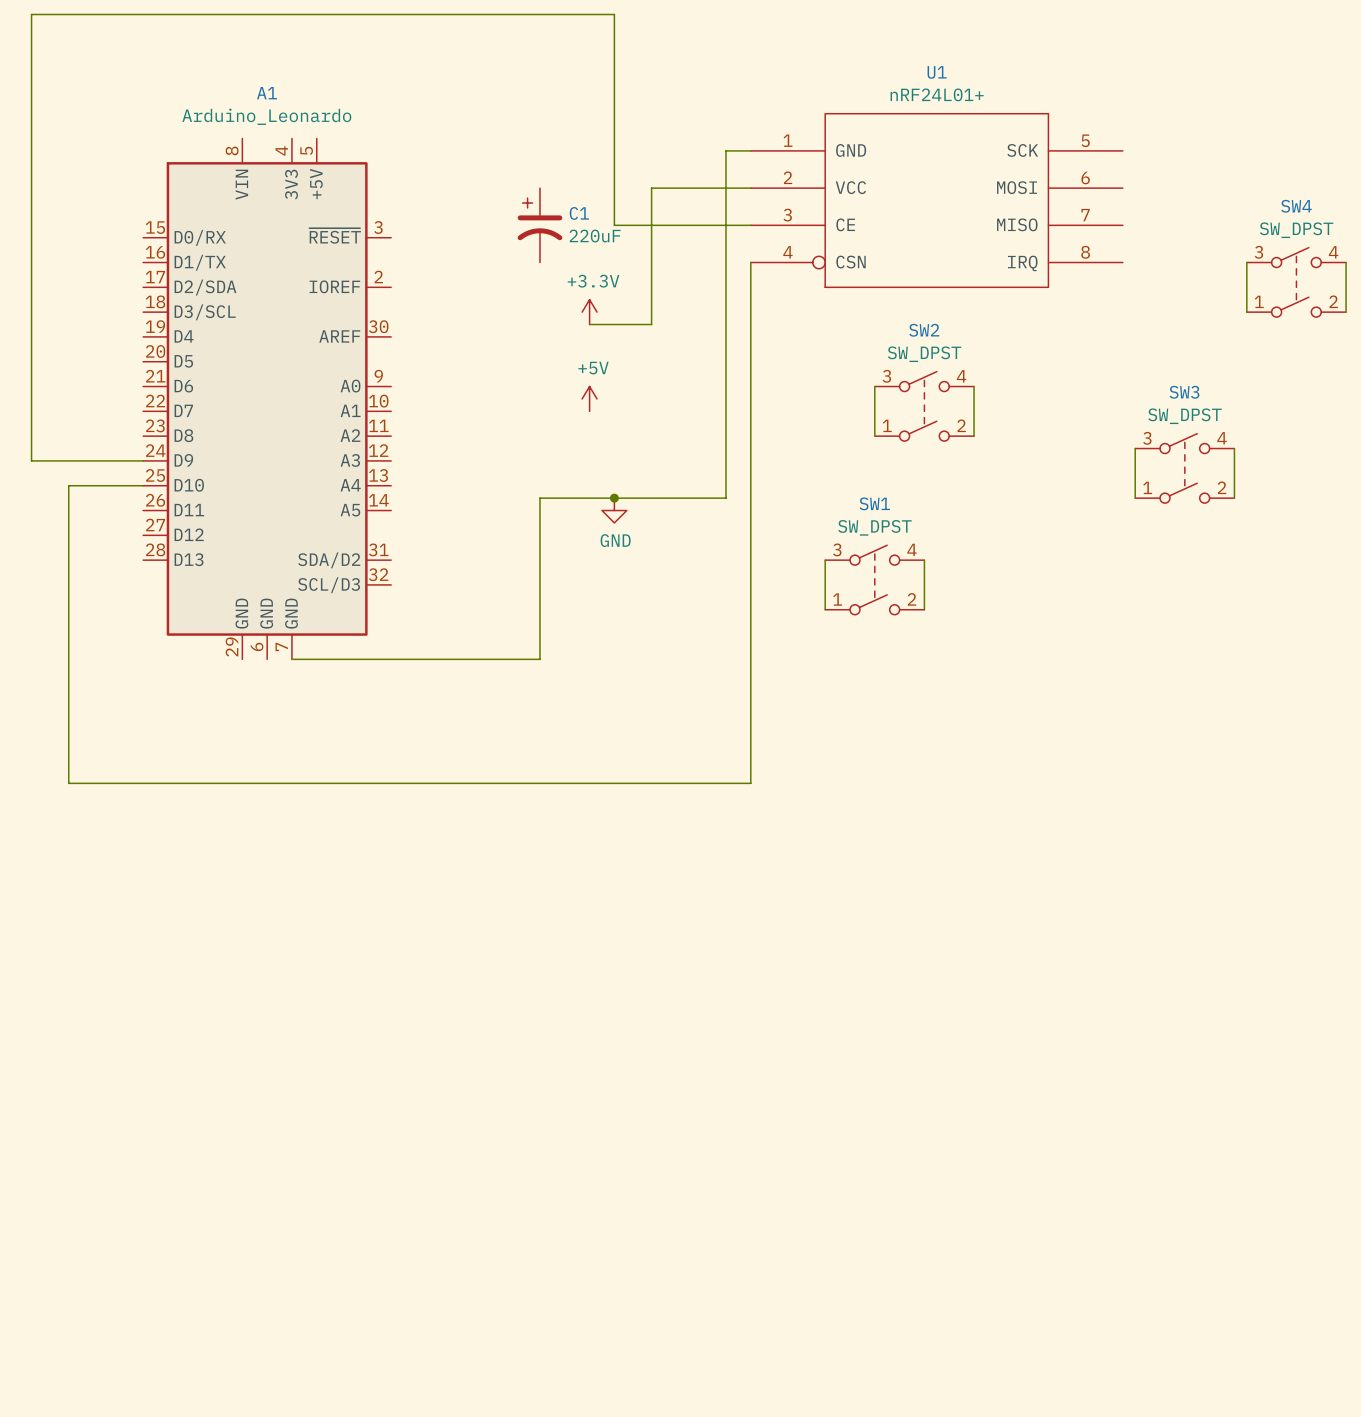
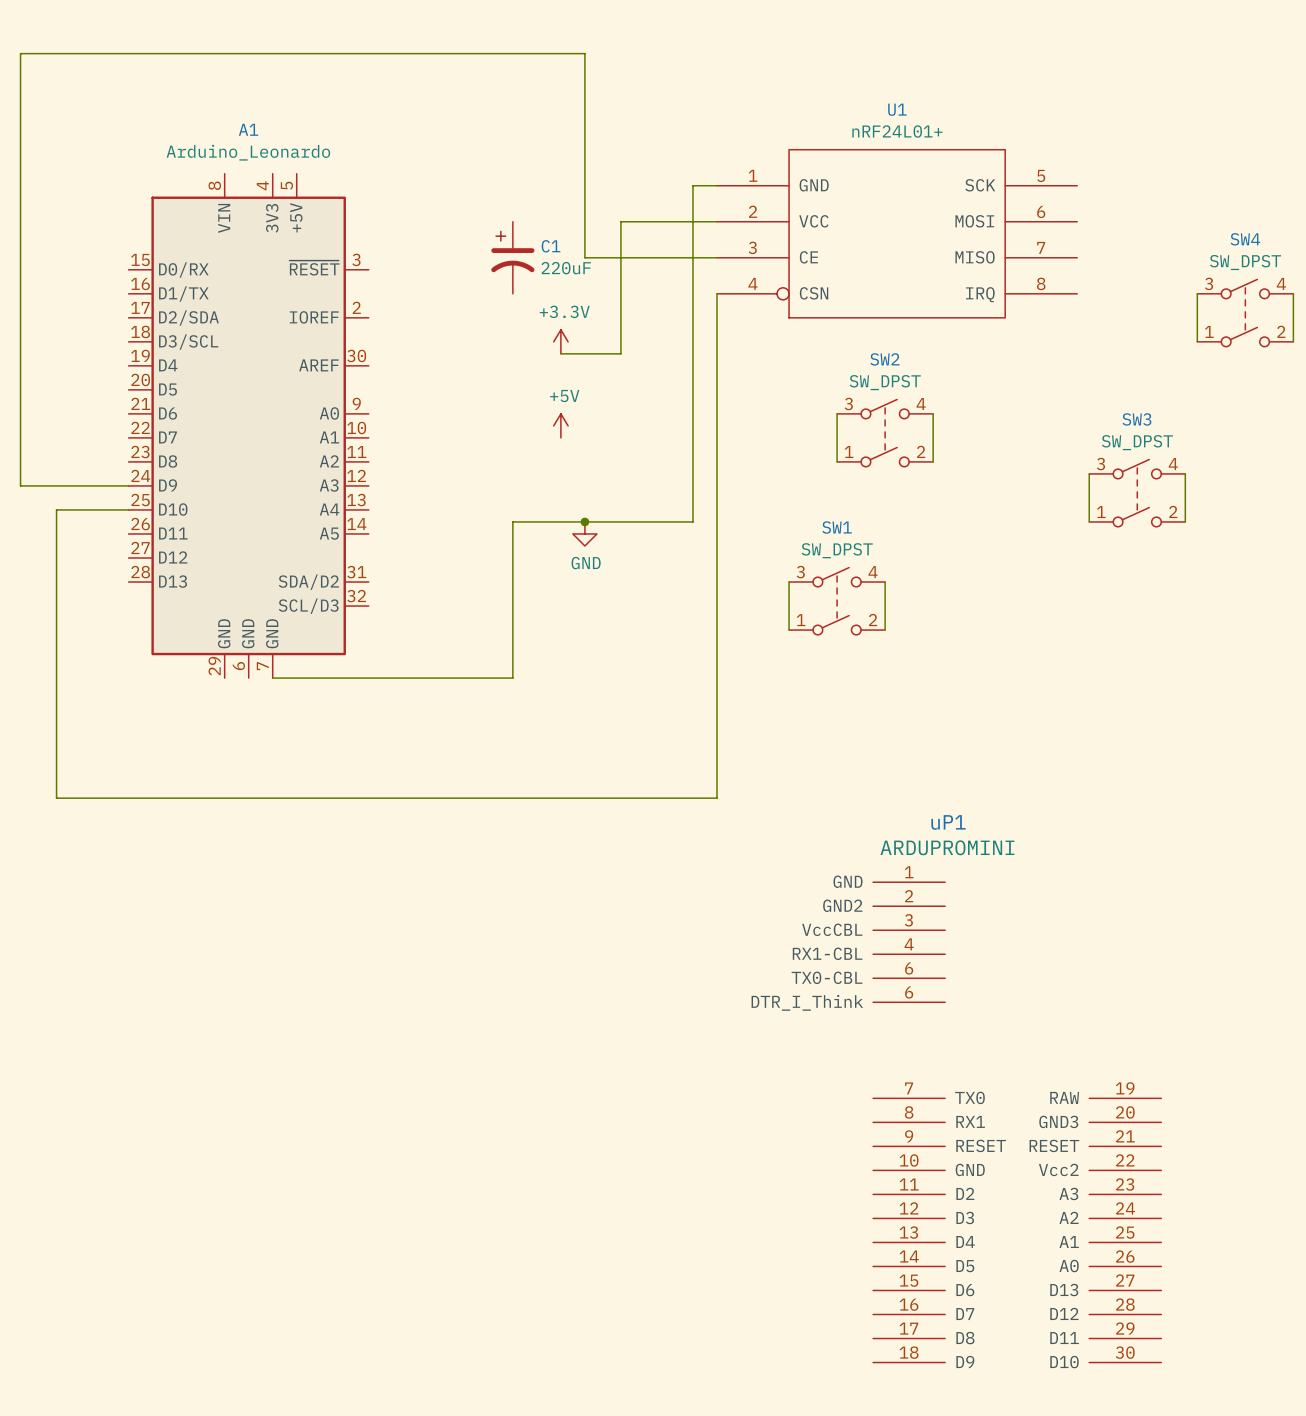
uP1: none -> ARDUPROMINI (1017, 1122)

